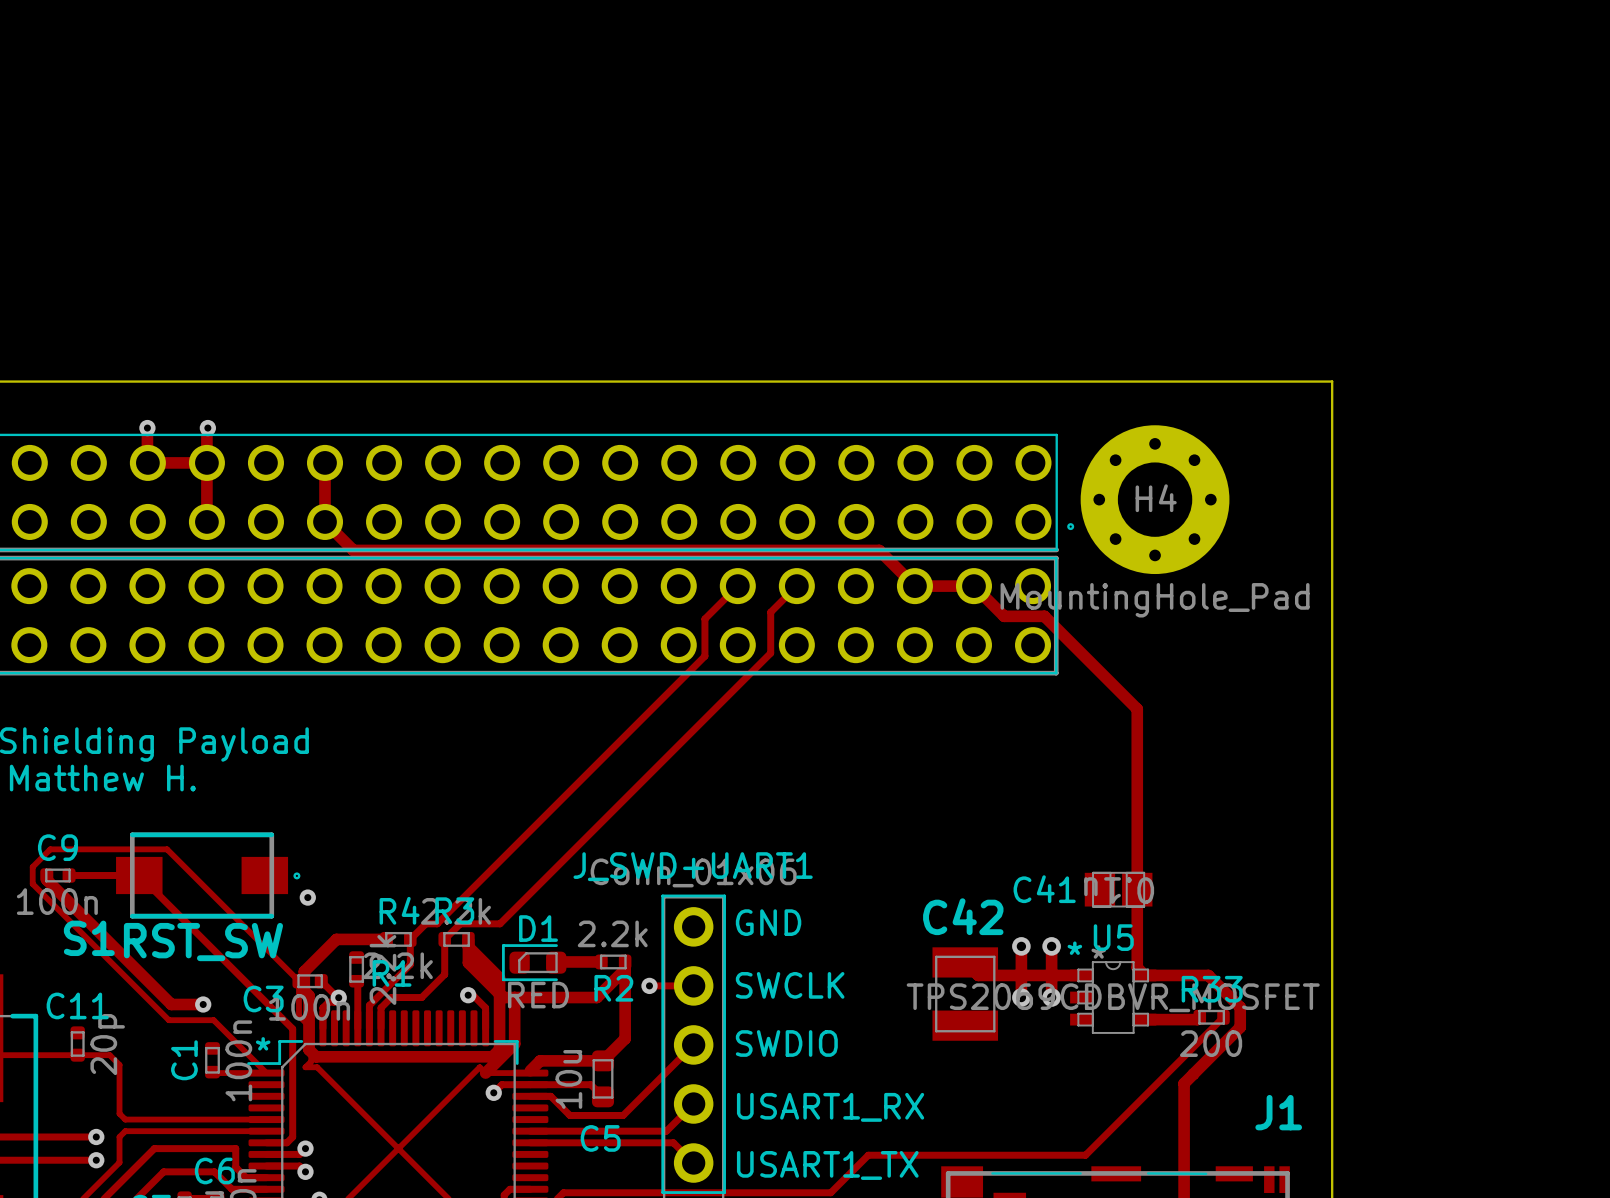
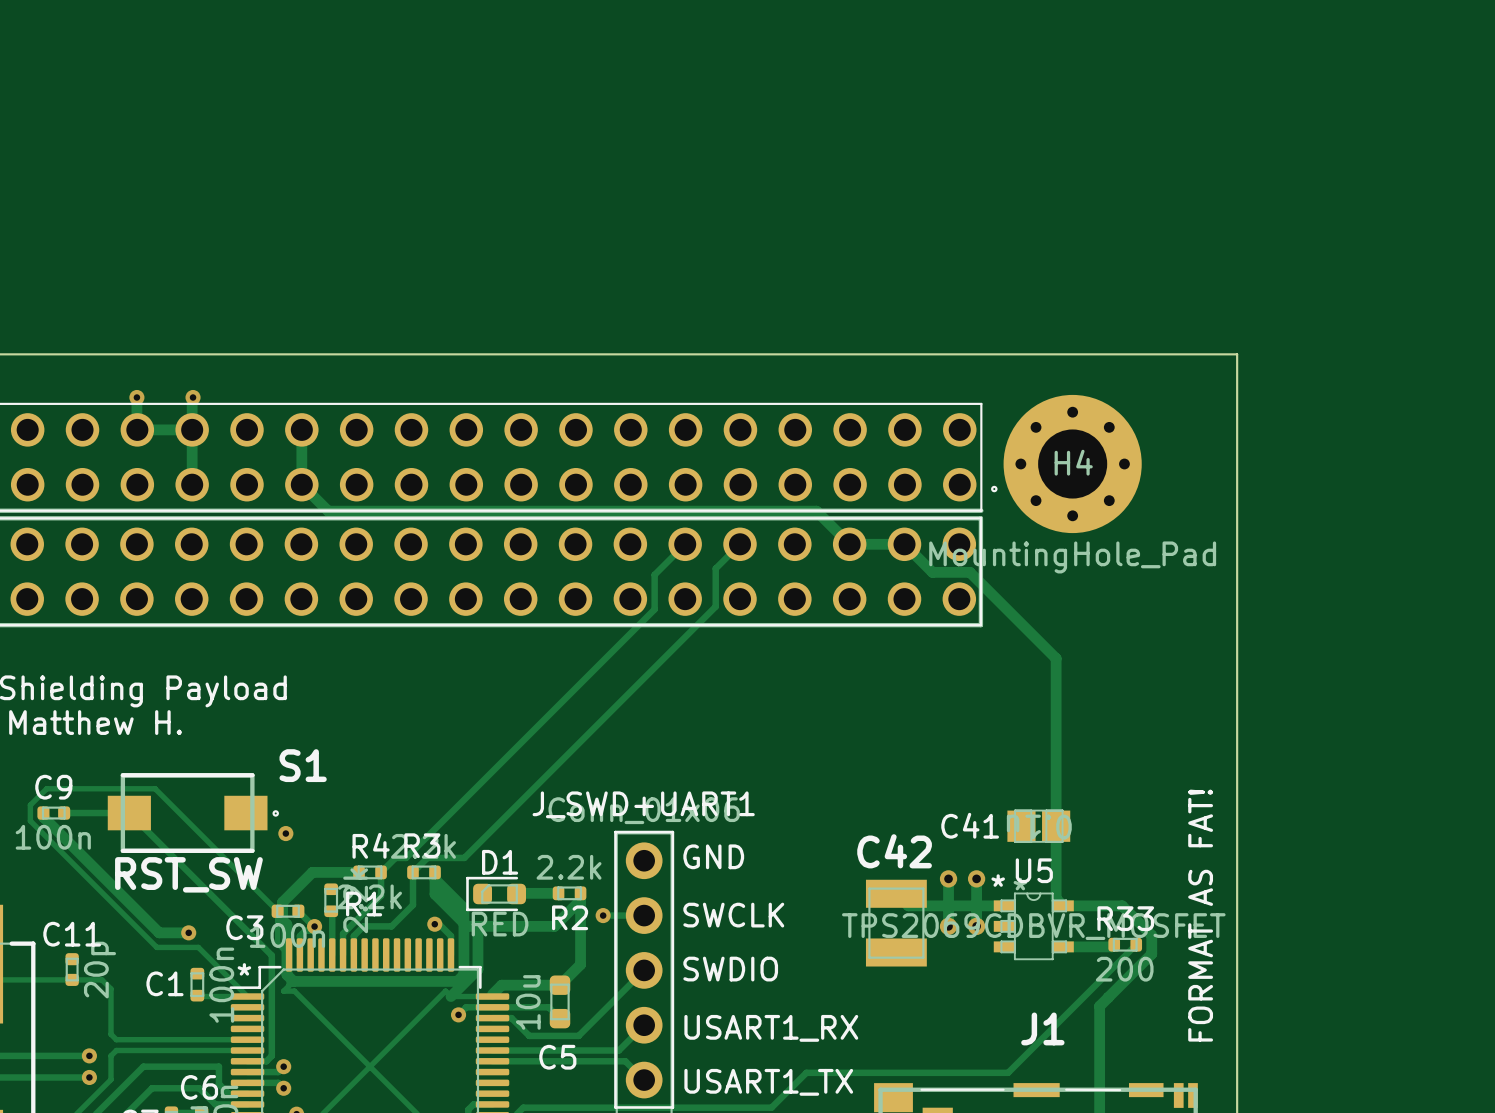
S1 name position: S1 (89, 938) -> S1 (303, 765)
text: none -> FORMAT AS FAT! (1200, 915)
C1 name rotation: 0° (184, 1060) -> 90° clockwise (164, 983)
J1 name position: J1 (1278, 1112) -> J1 (1042, 1028)

